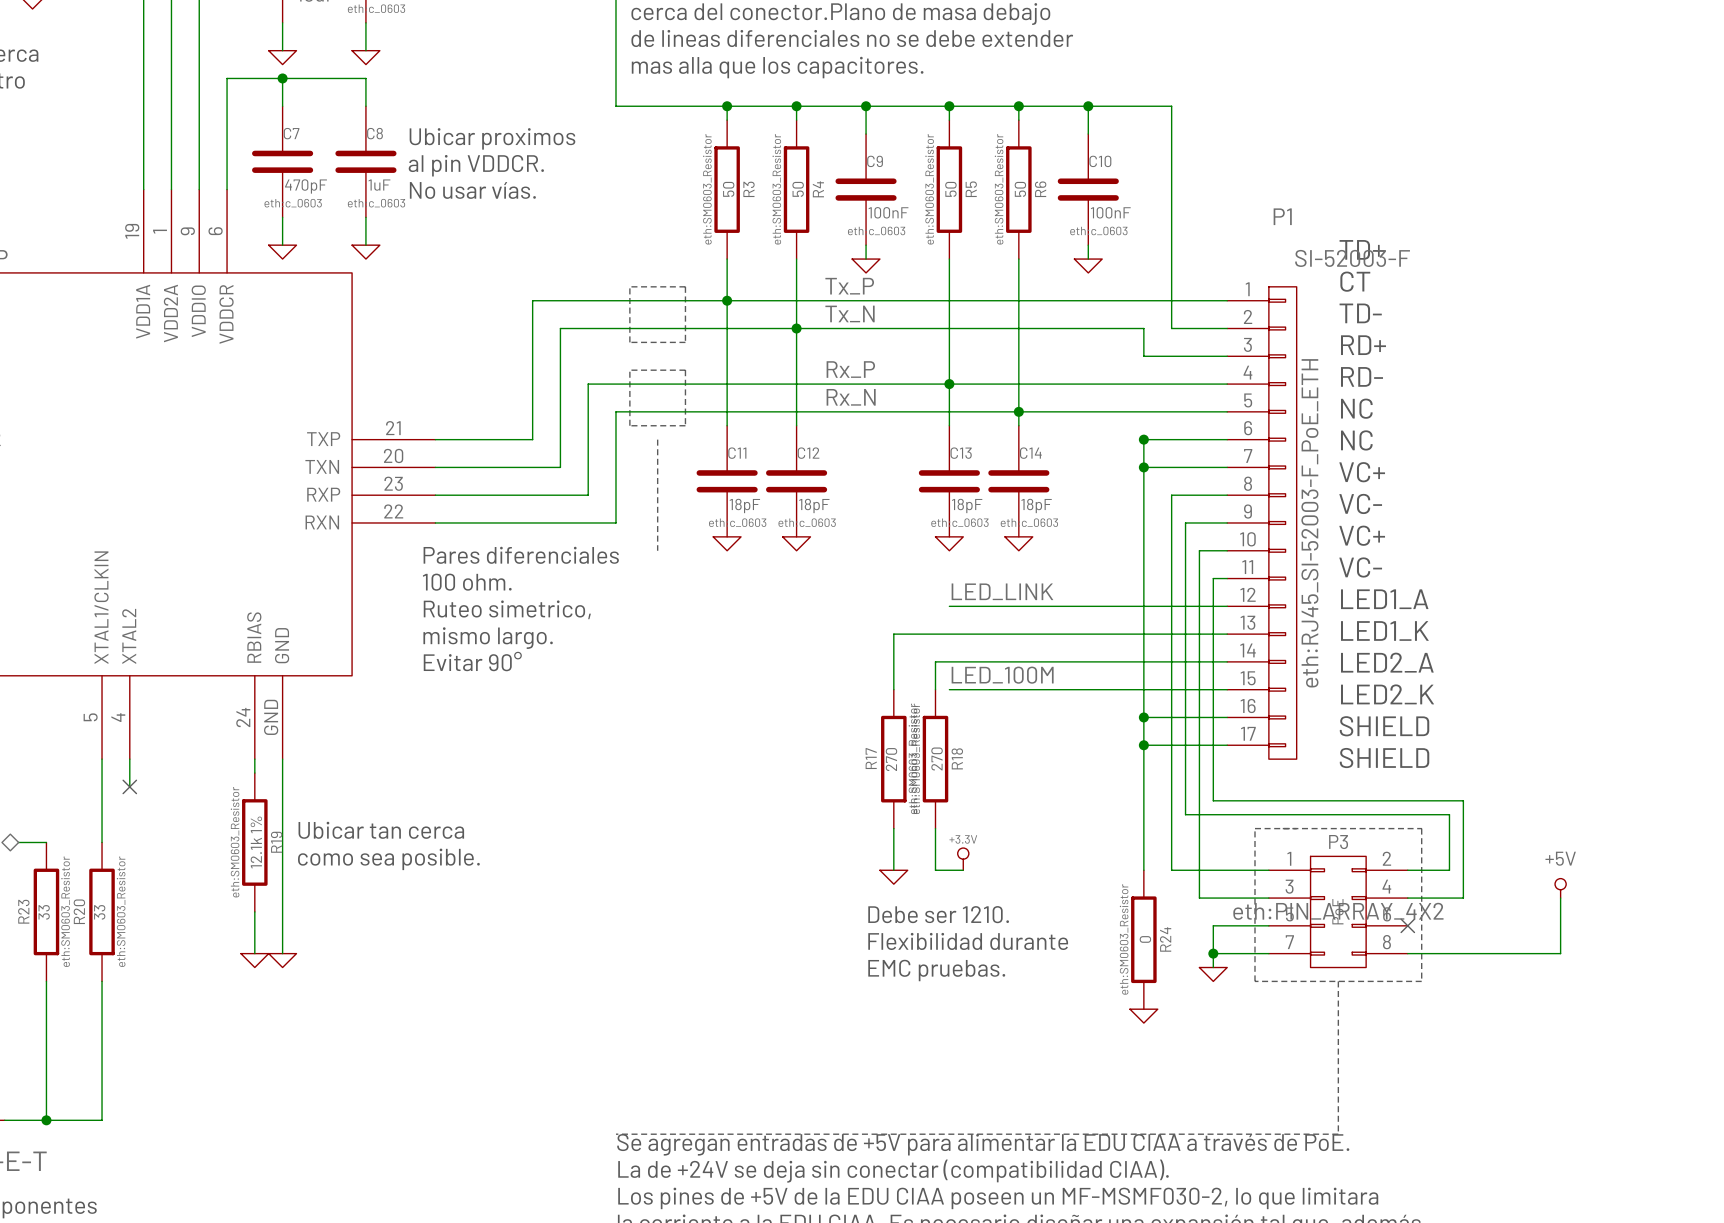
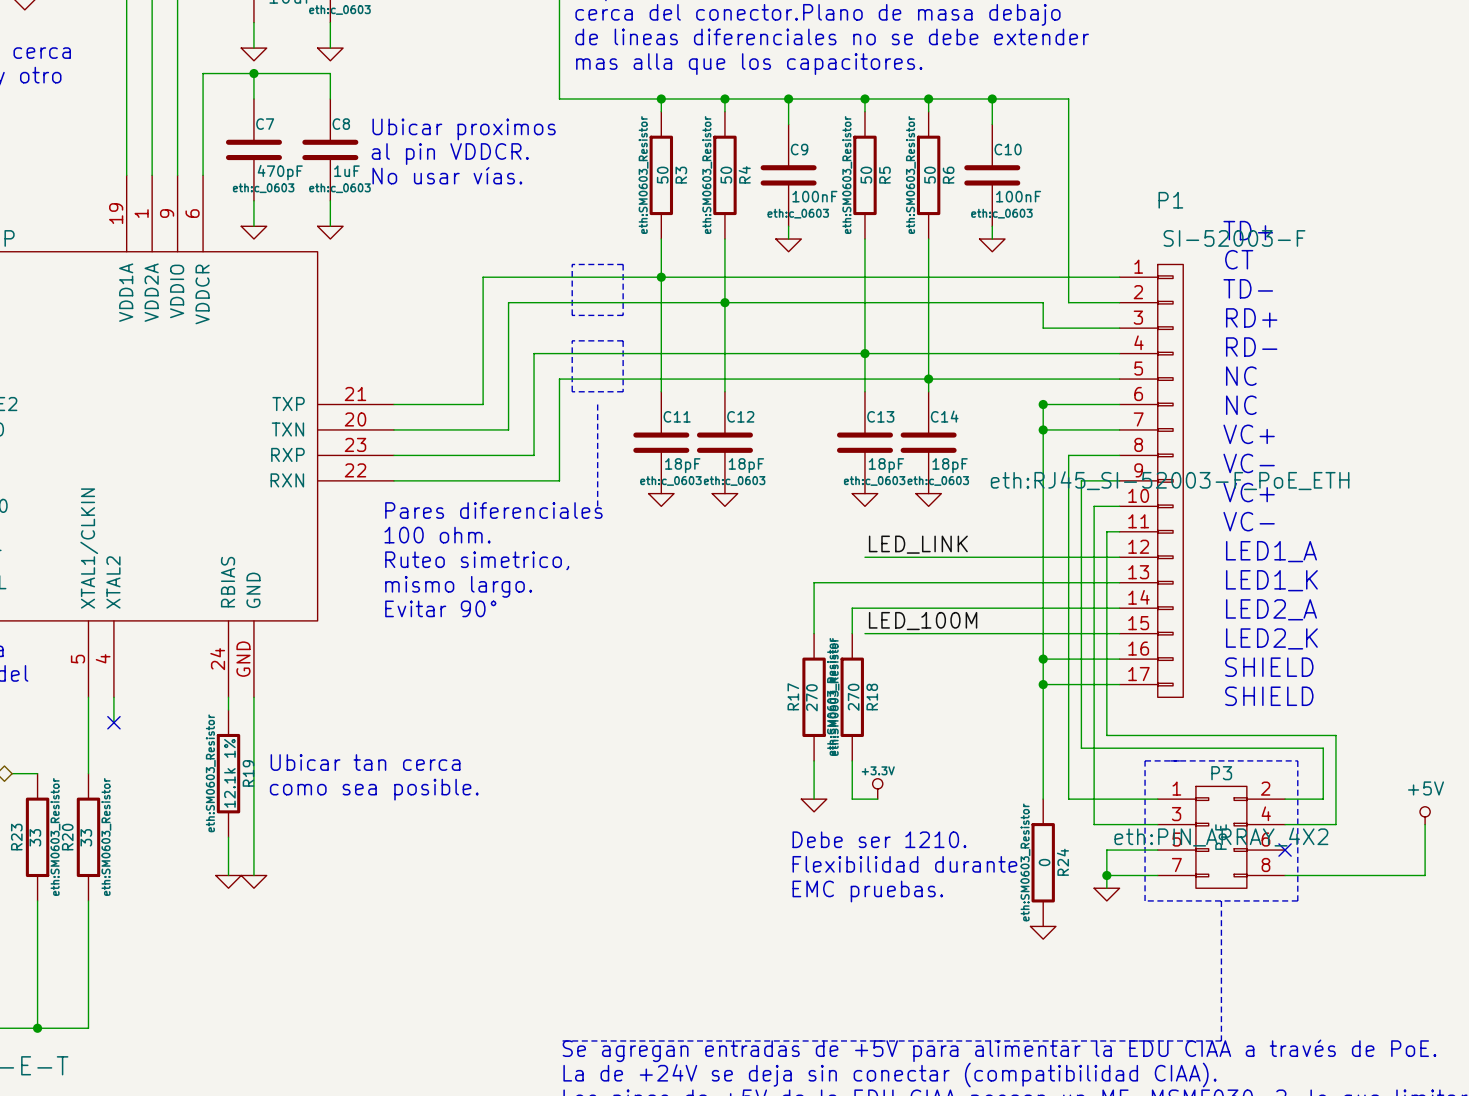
label: Tx_P (849, 286) -> none
label: Tx_N (850, 313) -> none
label: Rx_P (850, 369) -> none
label: Rx_N (851, 397) -> none
P1 text rotation: 0° (1309, 523) -> 90° clockwise (1170, 480)

